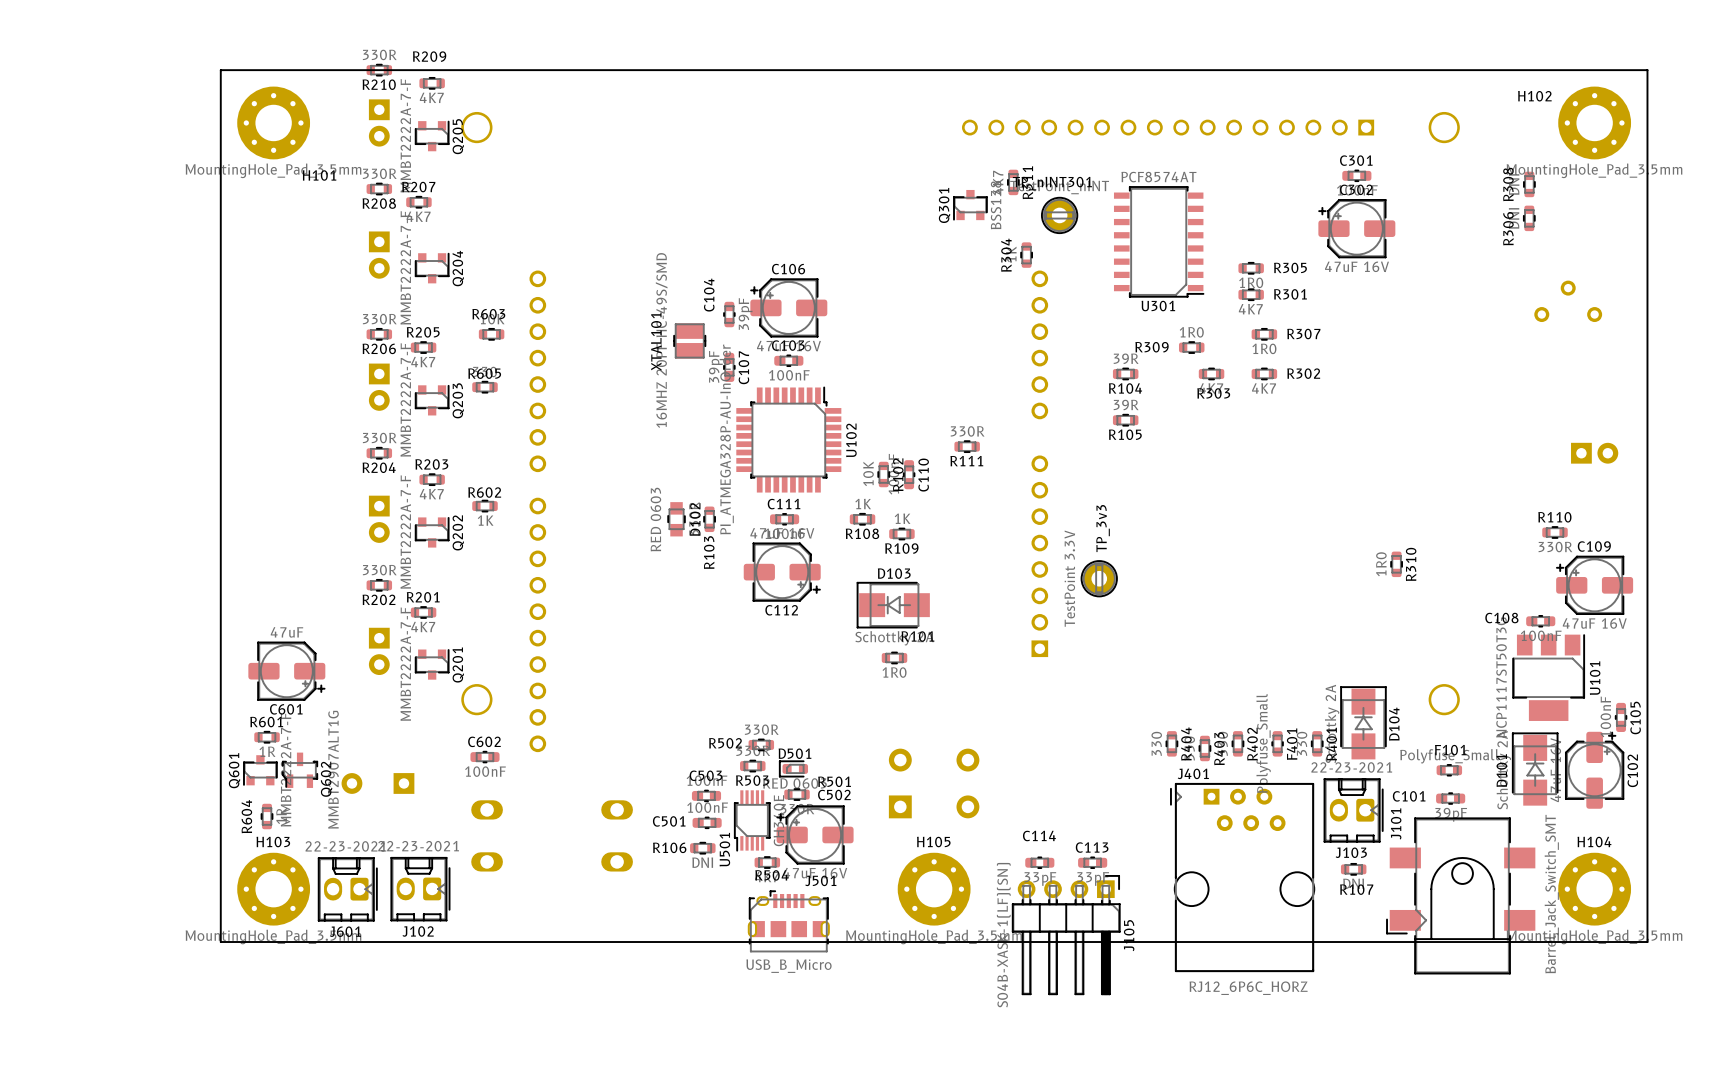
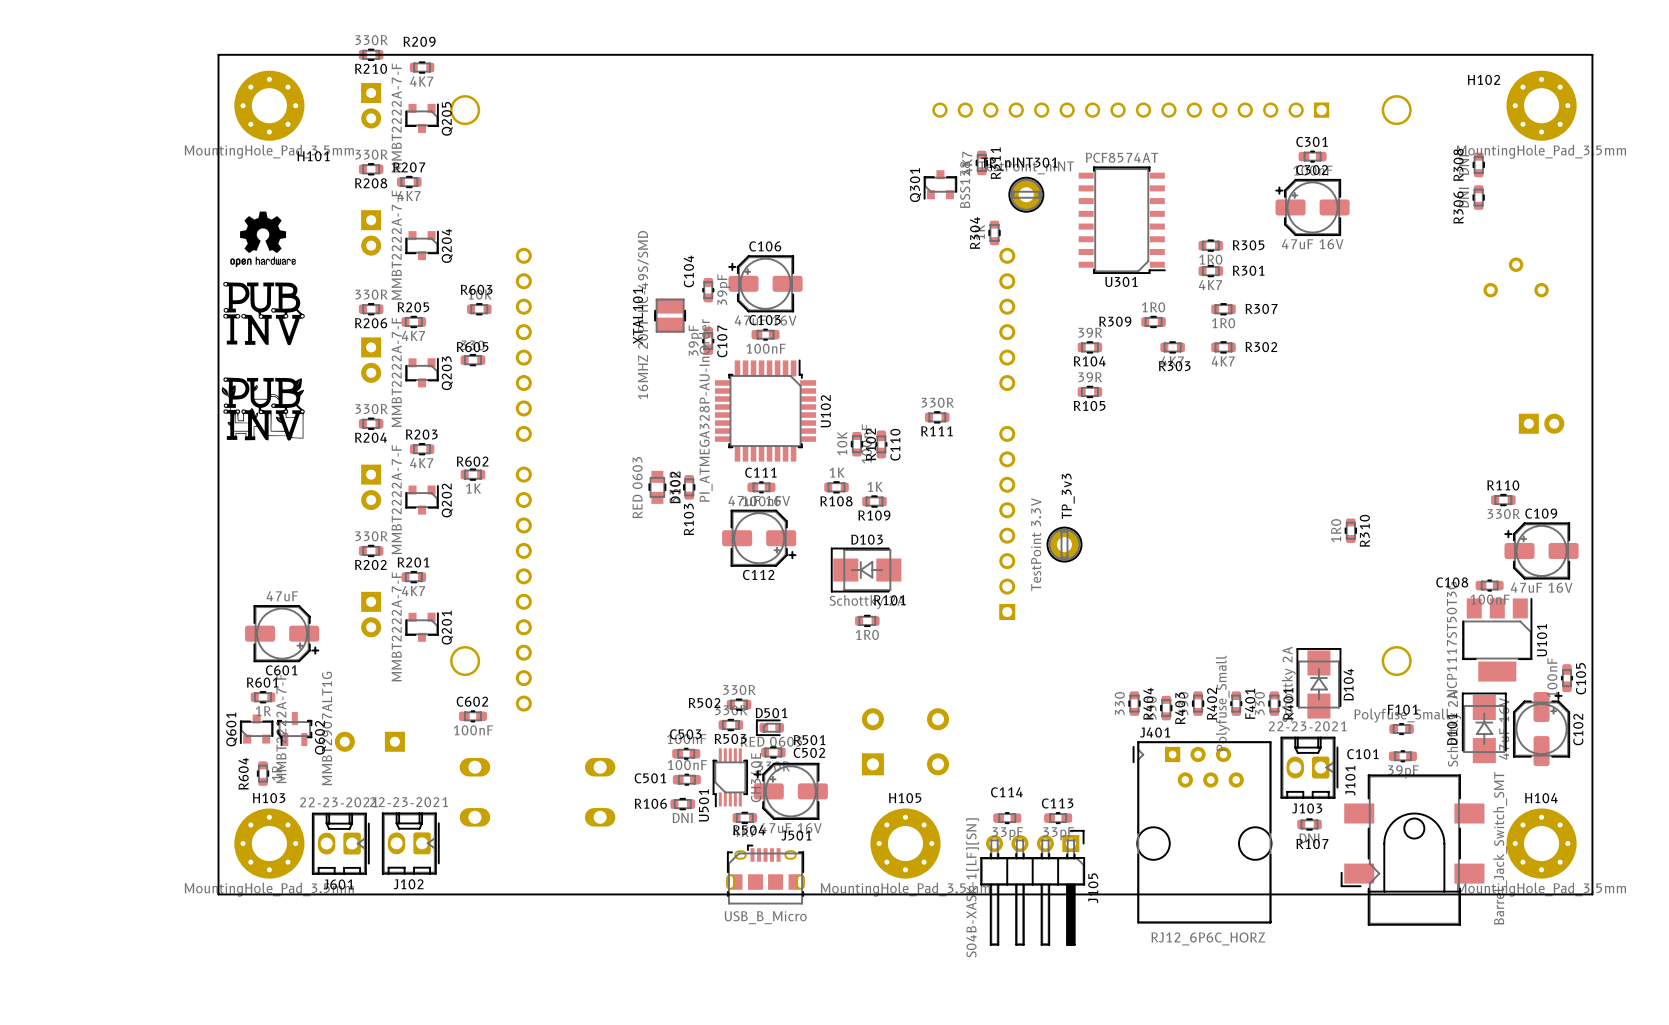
drawing: none -> [230, 211, 296, 268]
drawing: none -> [223, 281, 305, 346]
drawing: none -> [221, 377, 305, 441]

